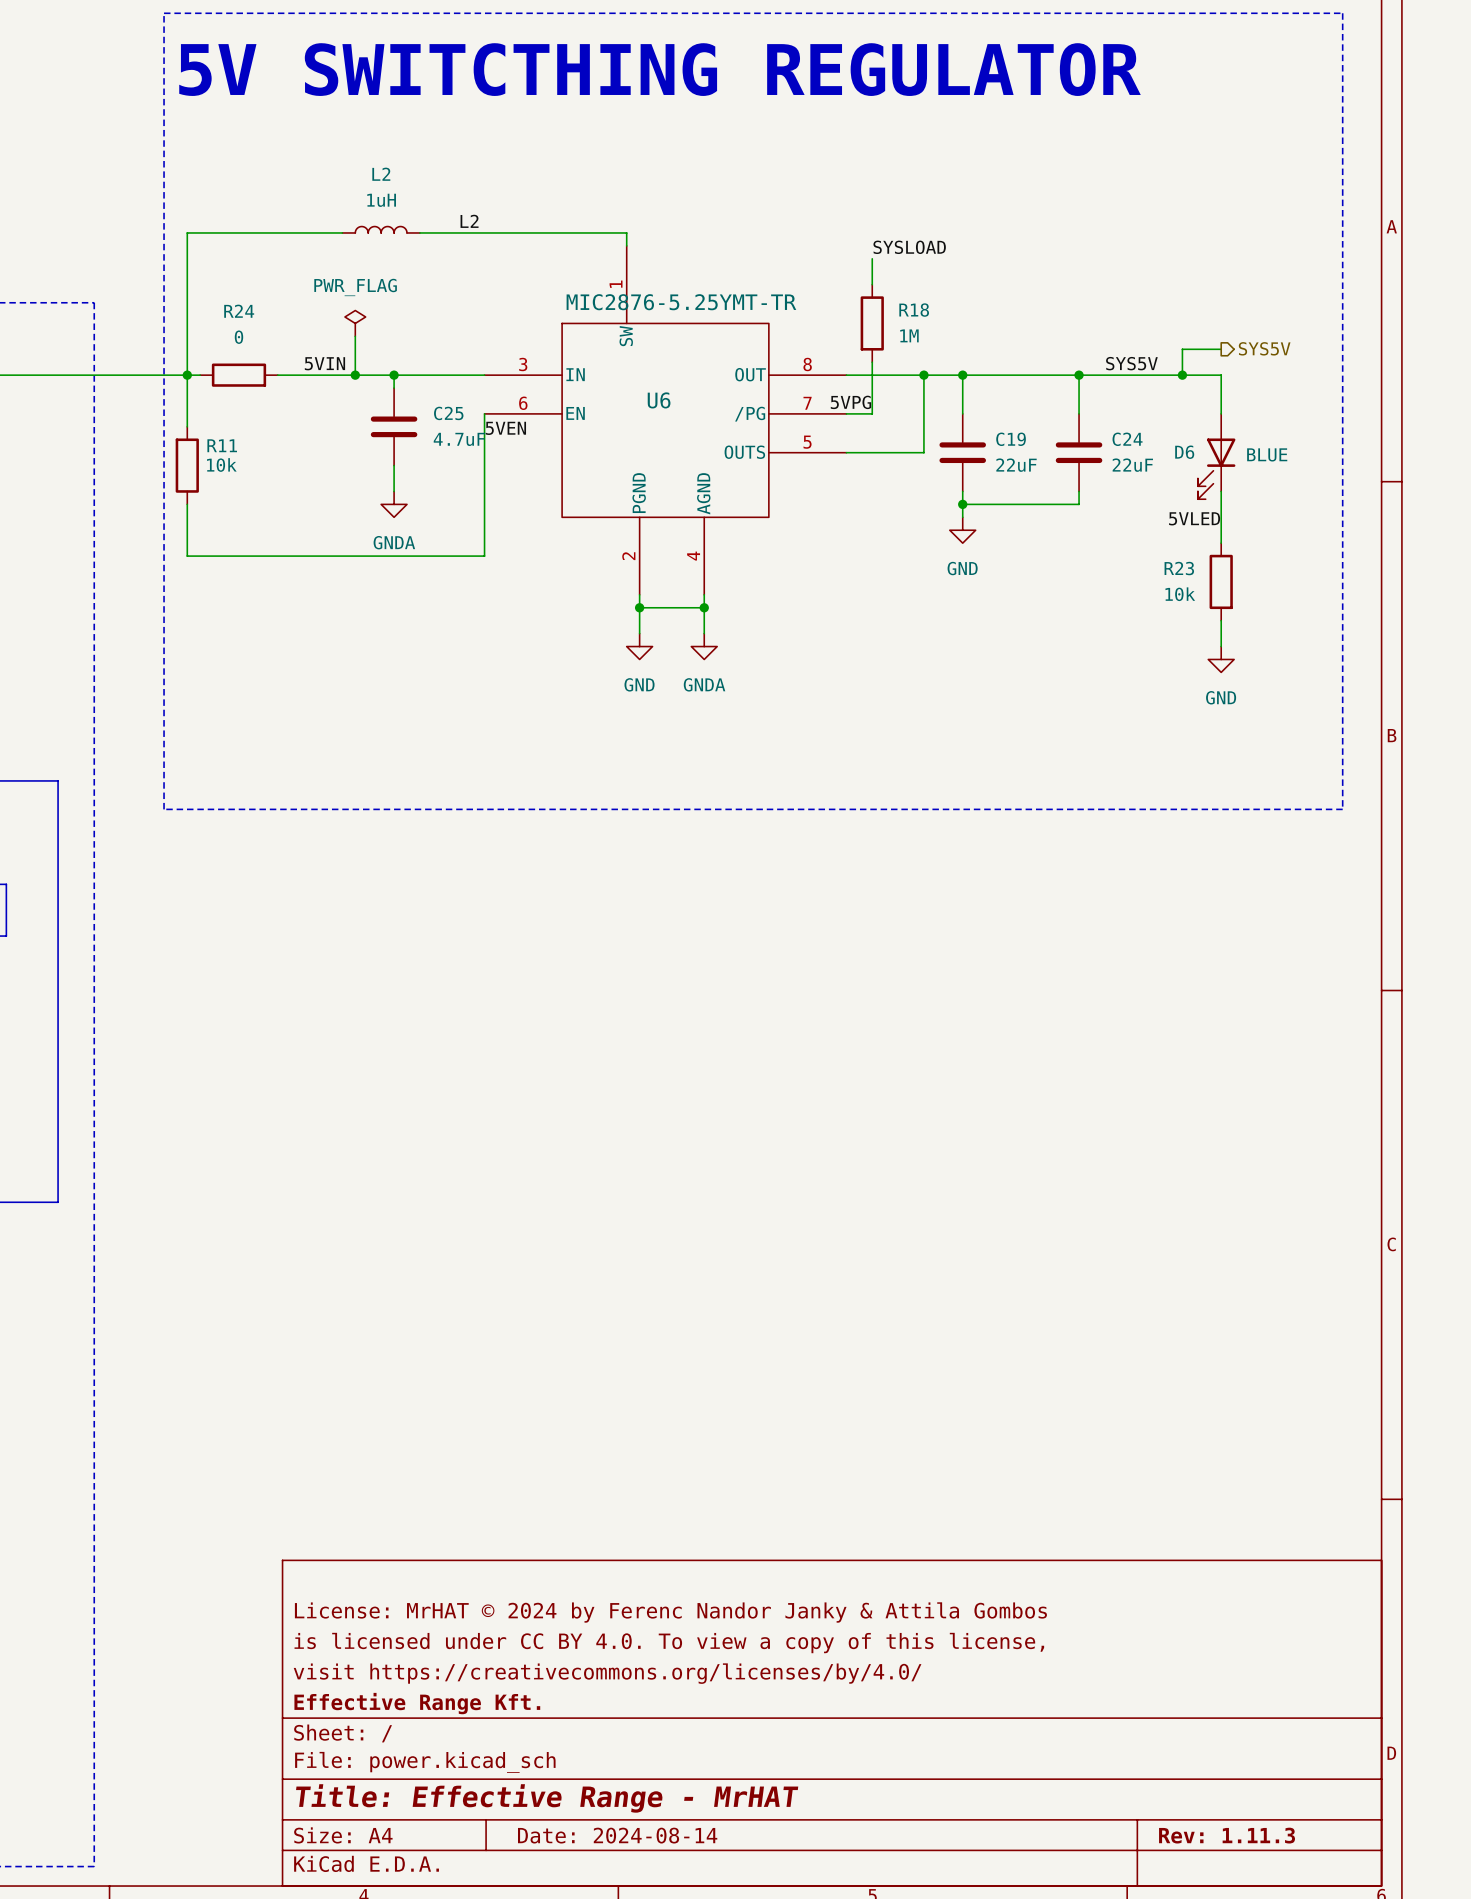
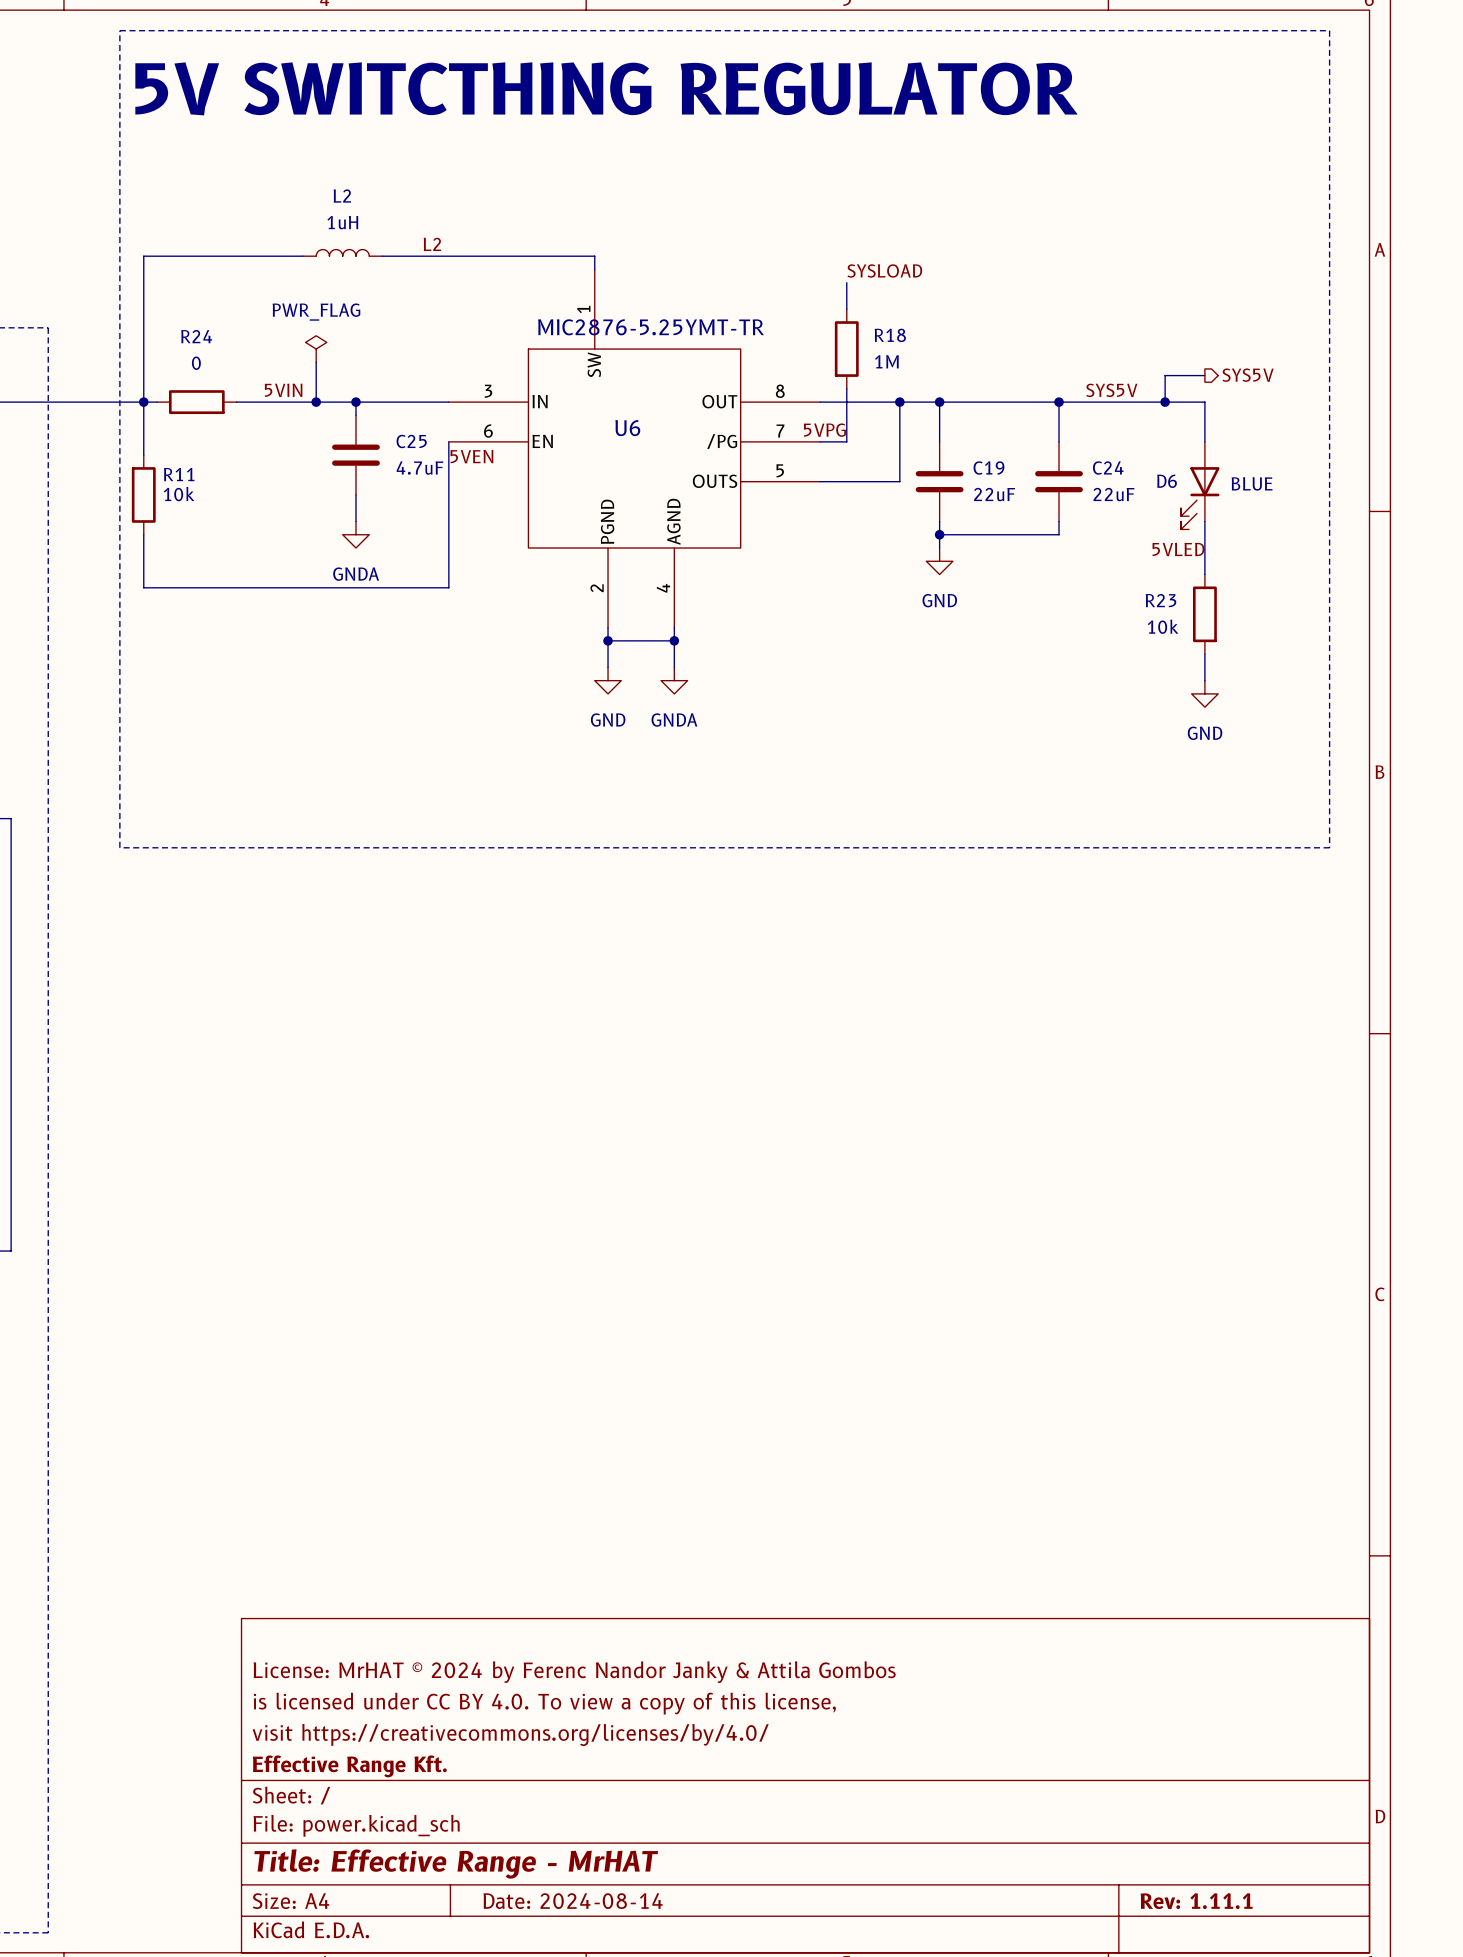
title block: Rev: 1.11.3 (1227, 1835) -> Rev: 1.11.1 (1196, 1901)

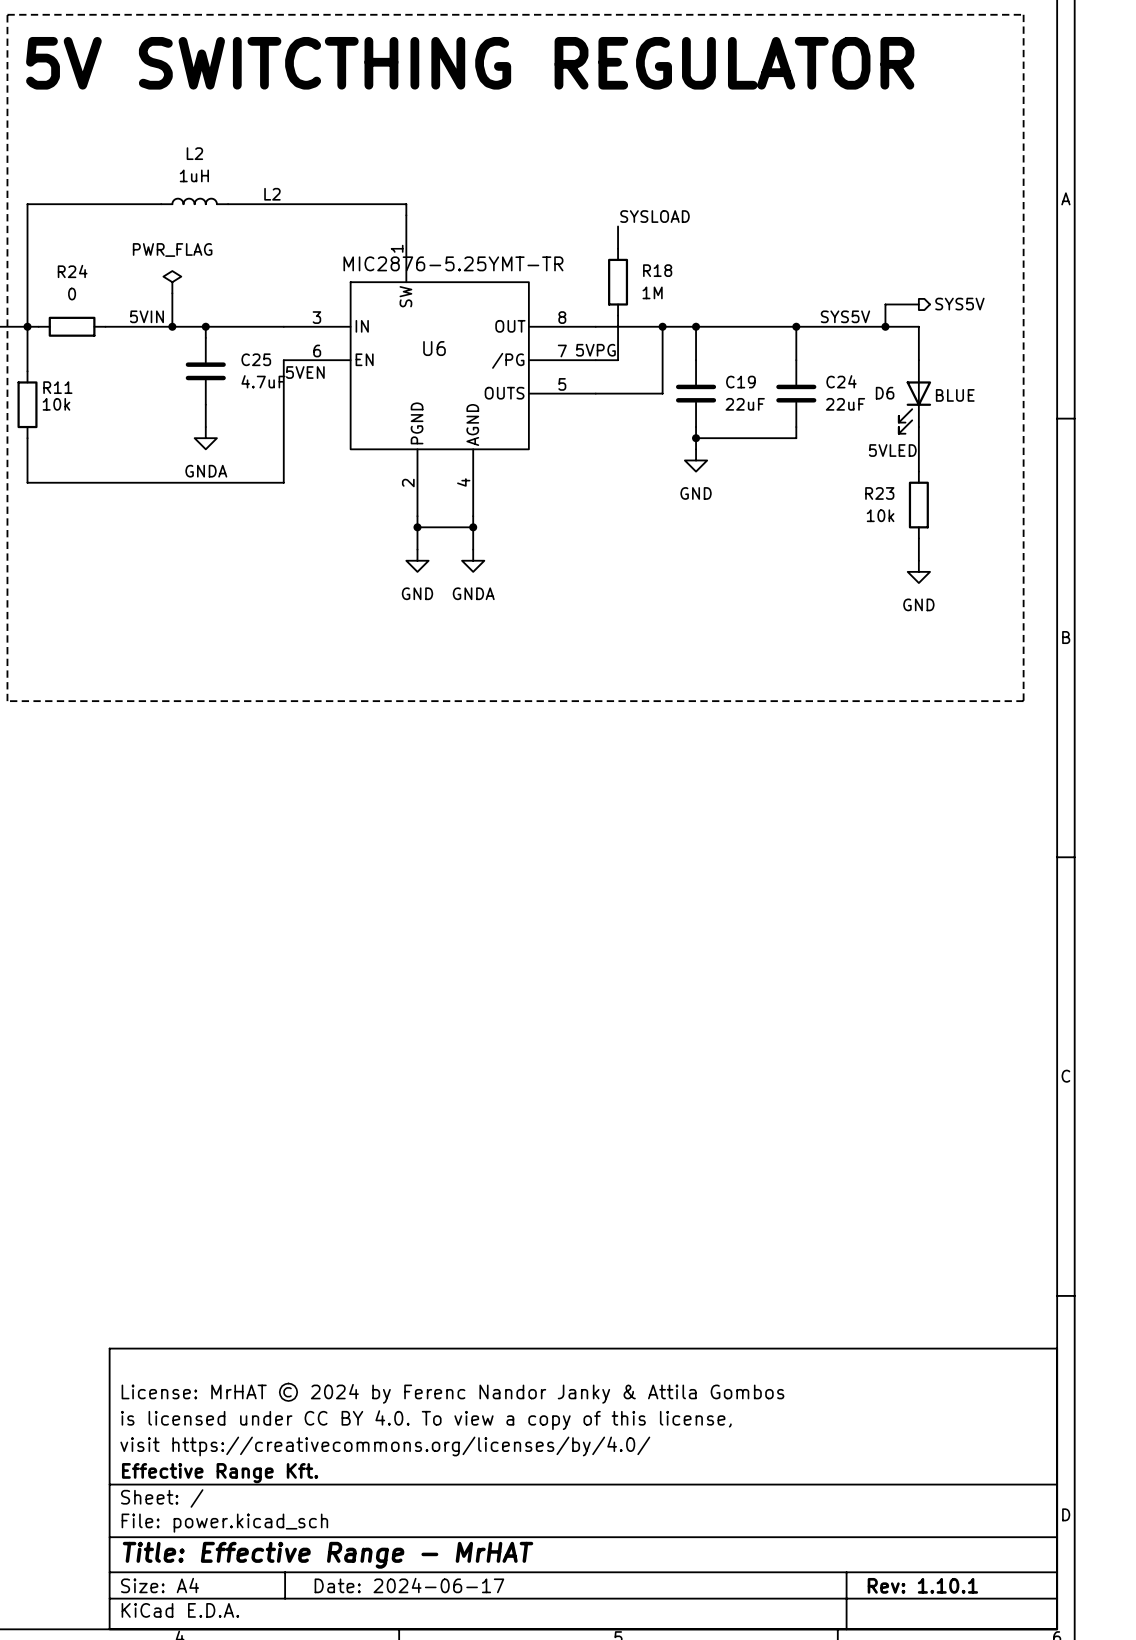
title block: Date: 2024-08-14 (573, 1901) -> Date: 2024-06-17 (409, 1585)
title block: Rev: 1.11.1 (1196, 1901) -> Rev: 1.10.1 (922, 1585)

